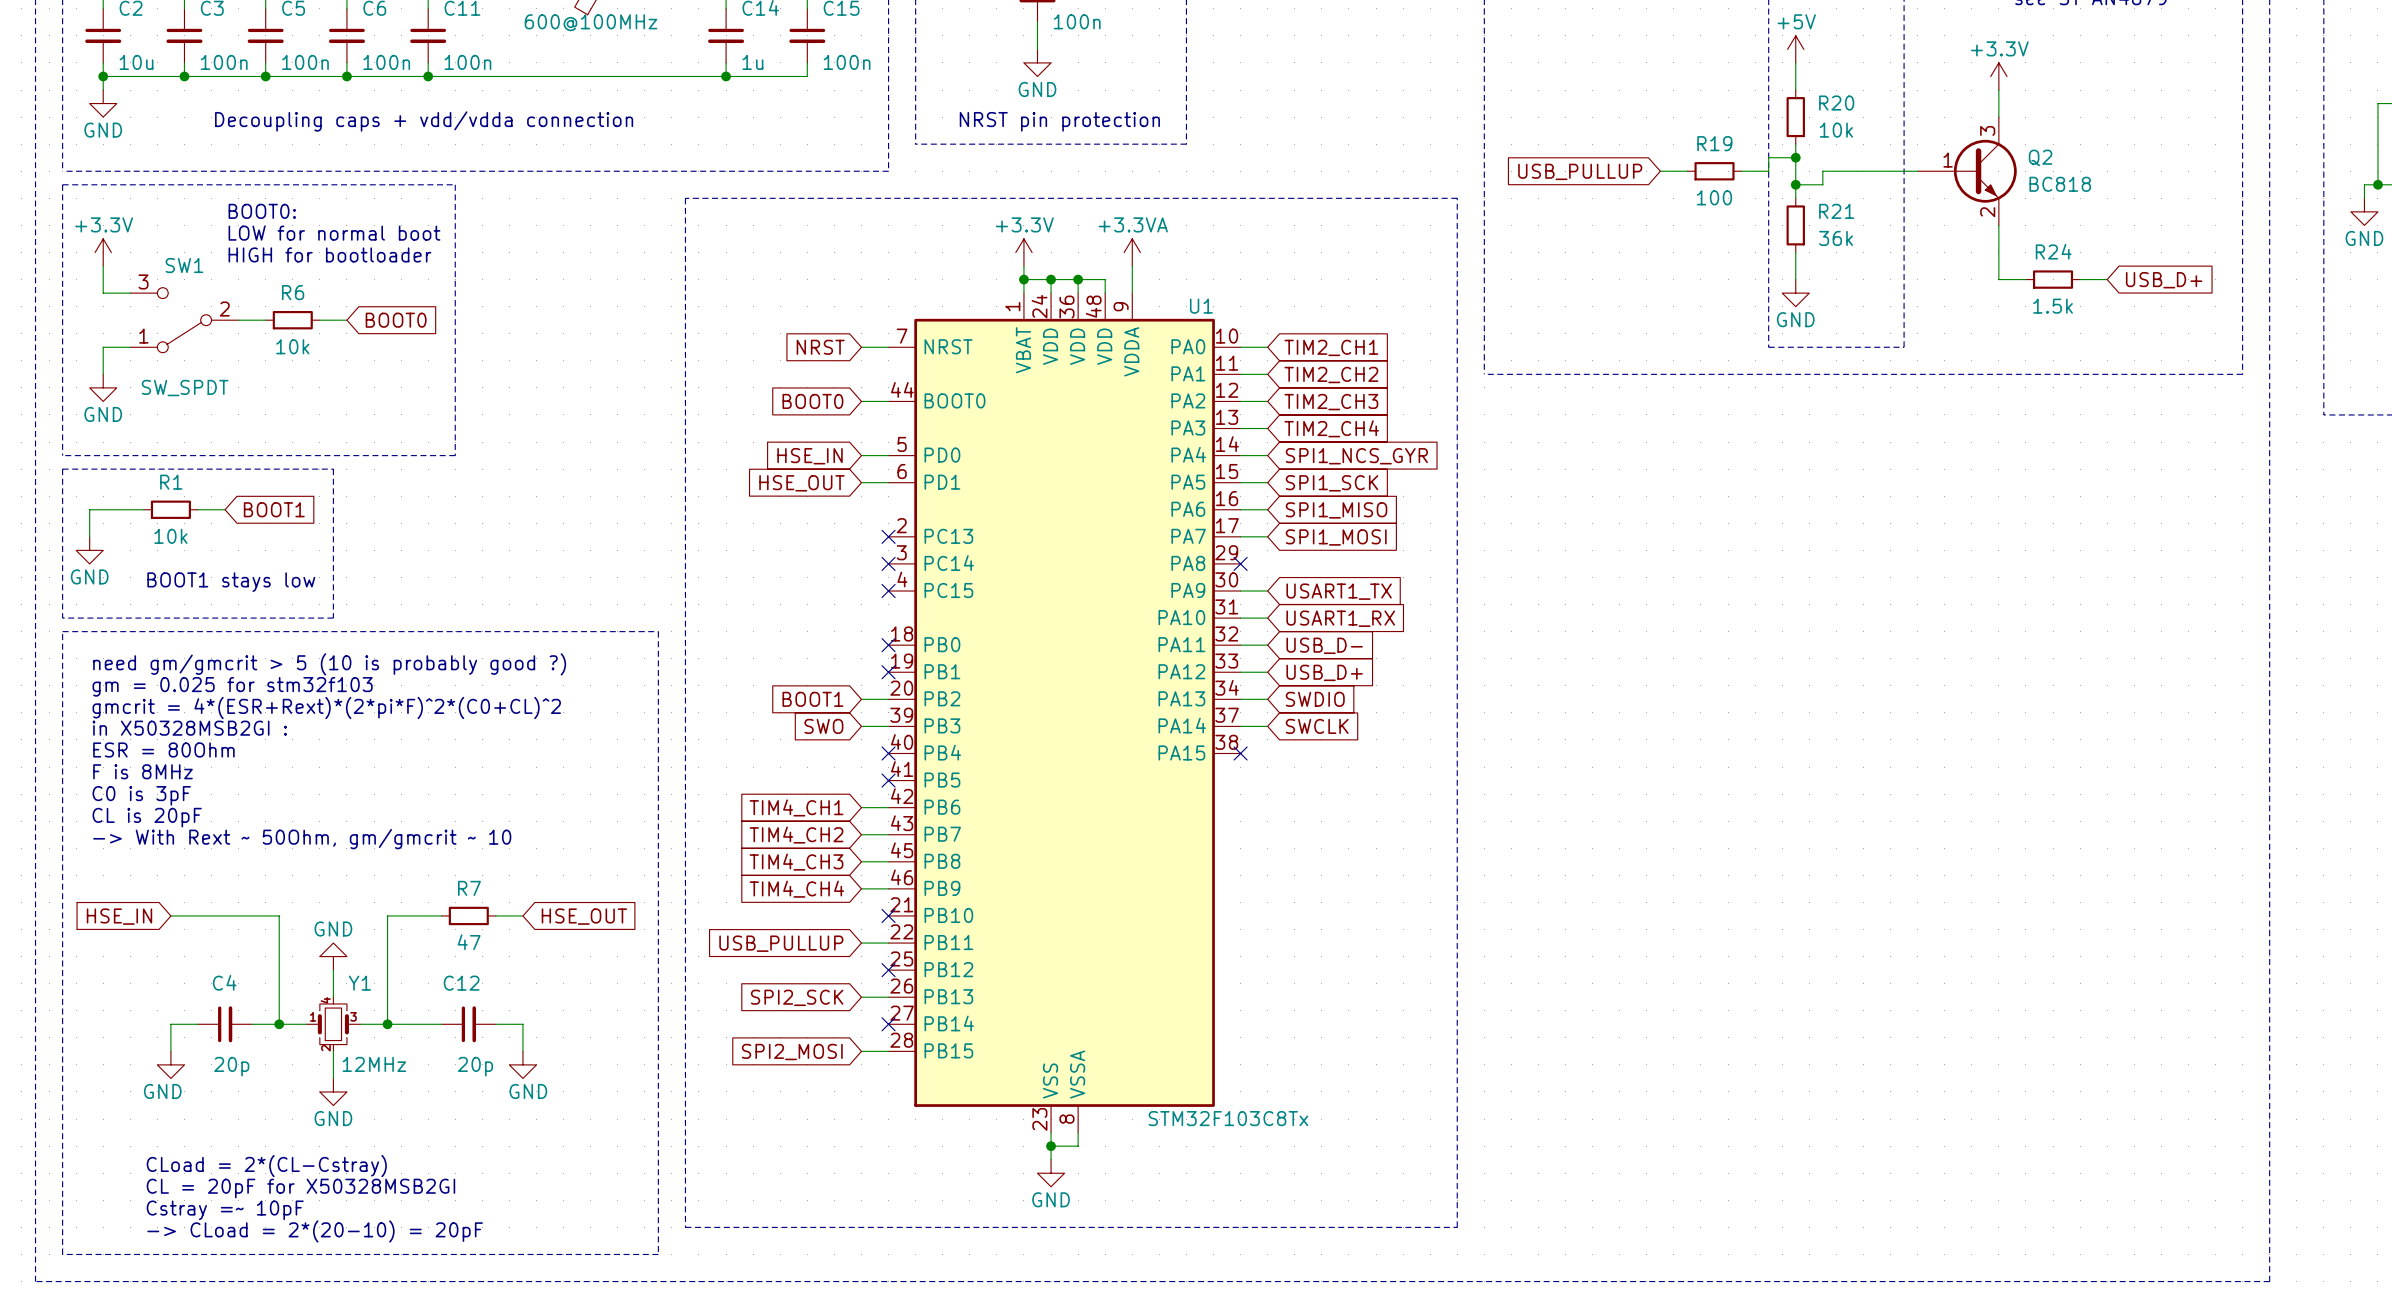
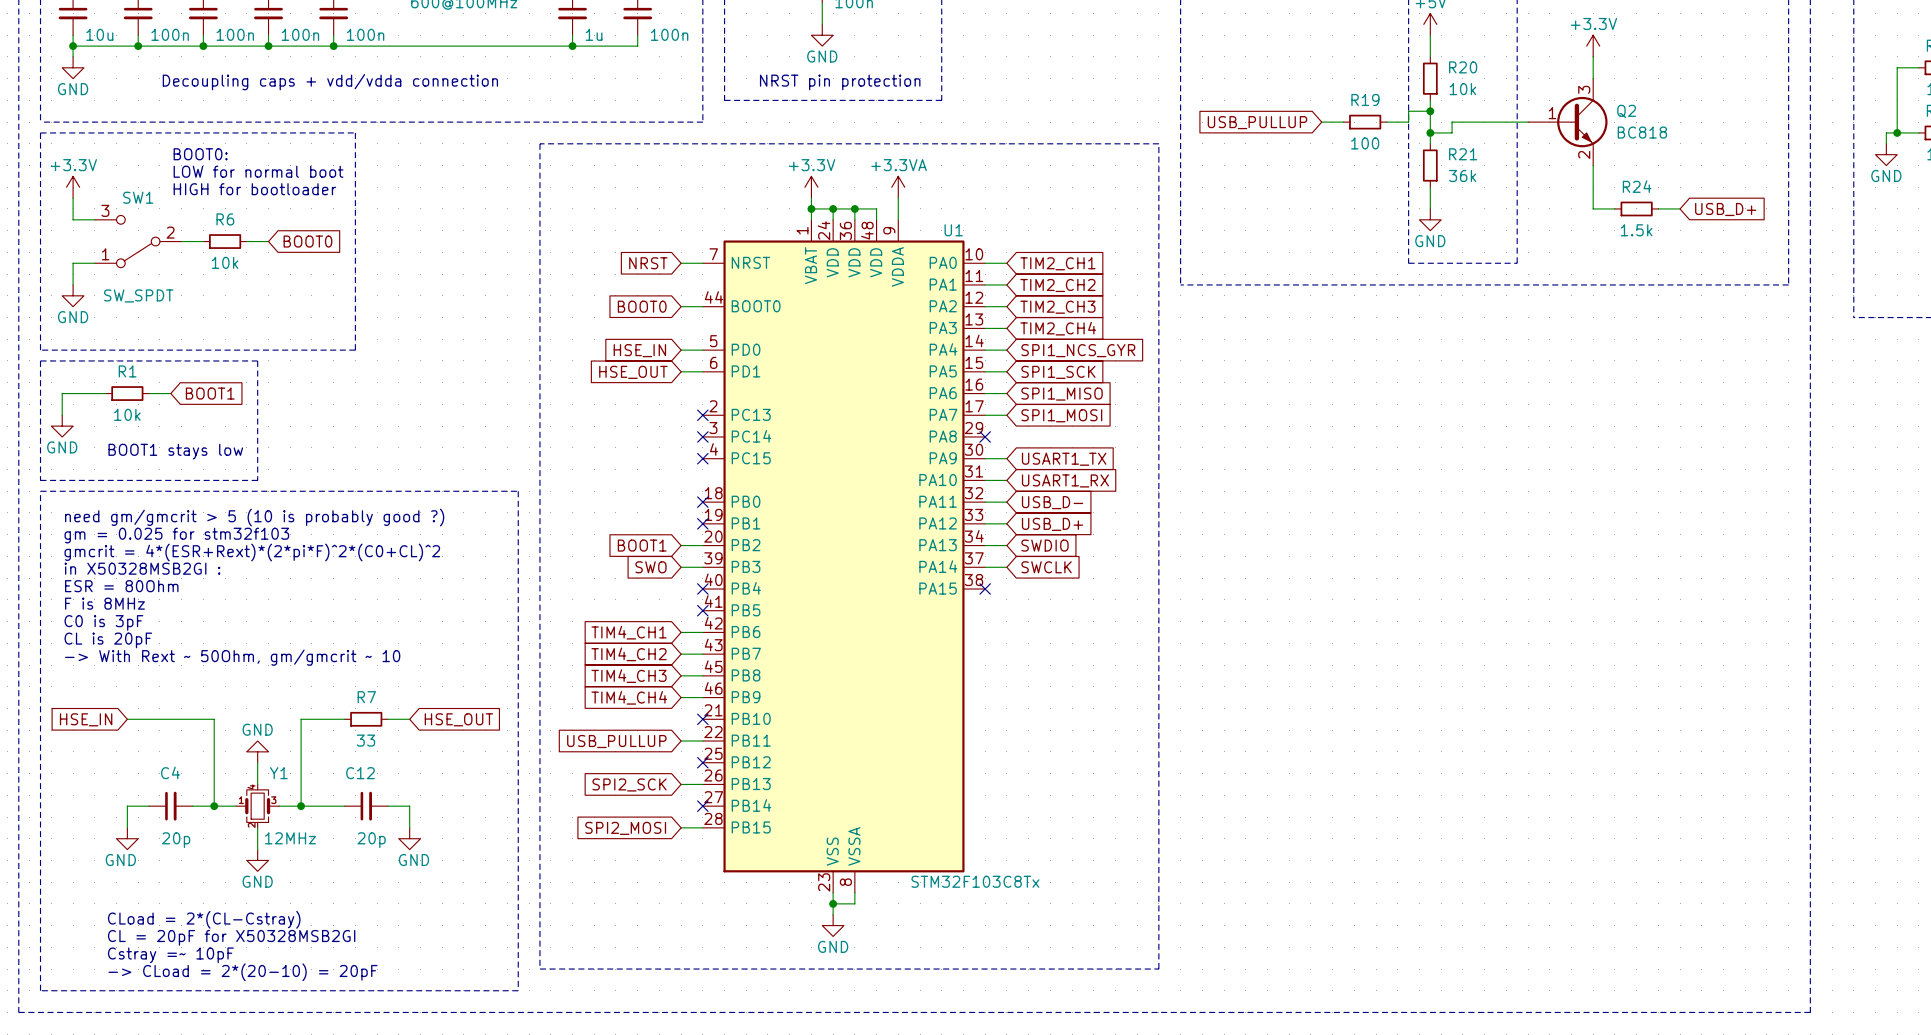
R7 value: 47 (469, 942) -> 33 (365, 740)

